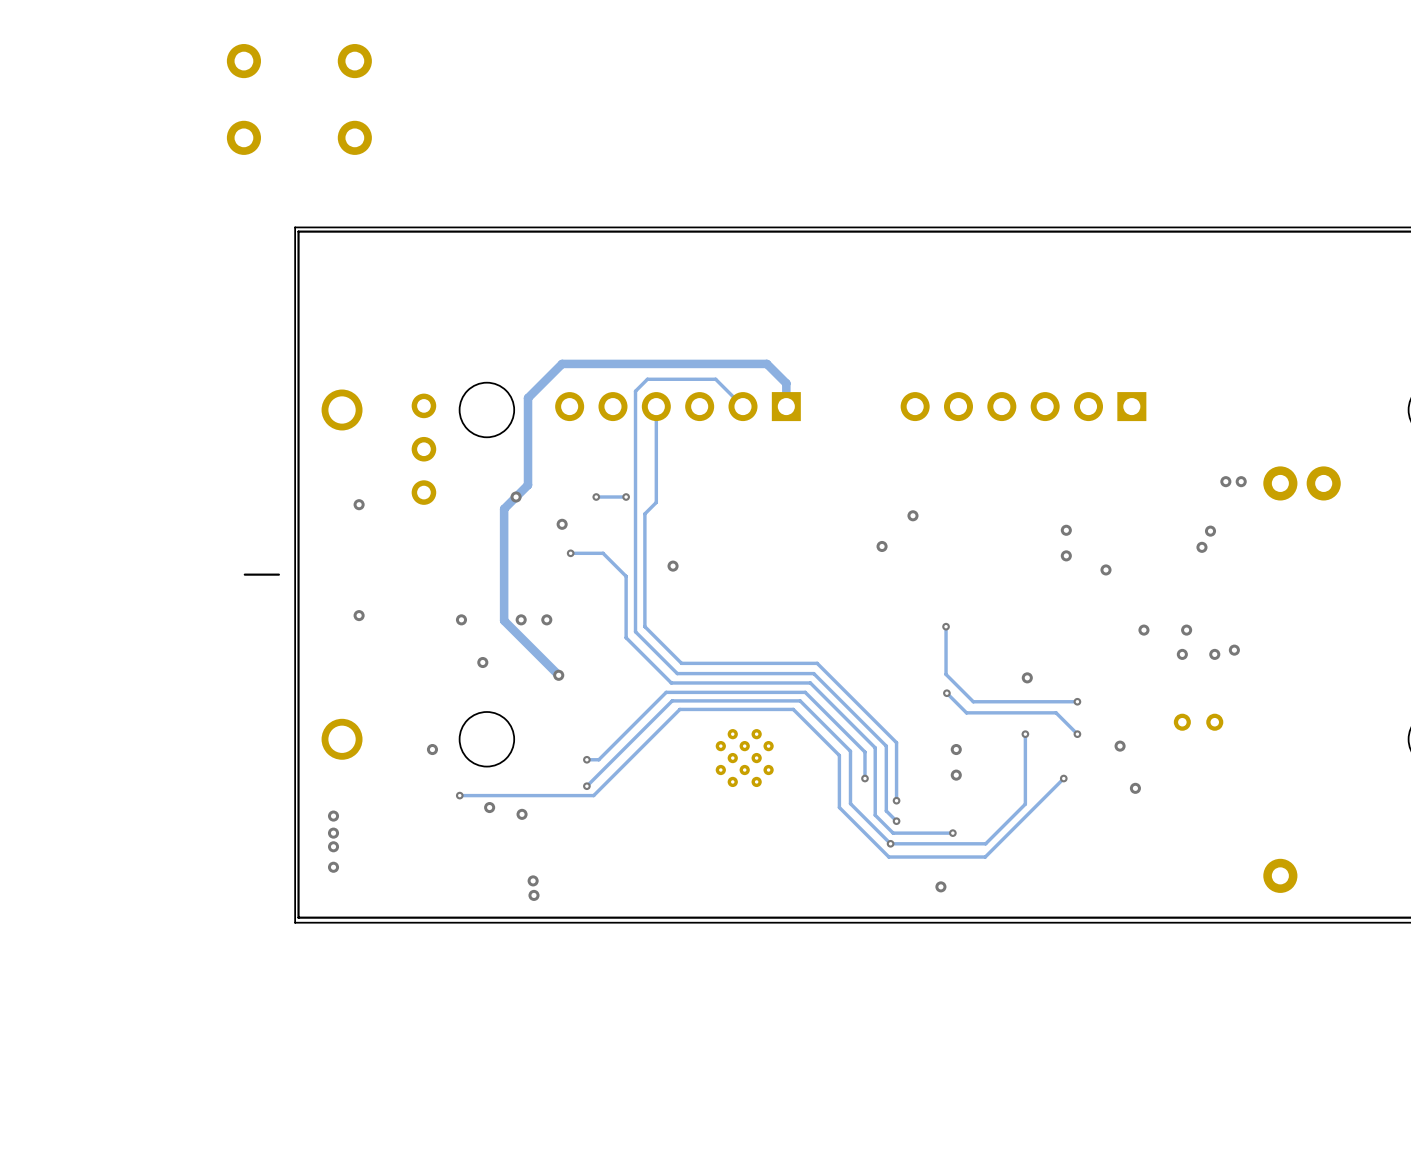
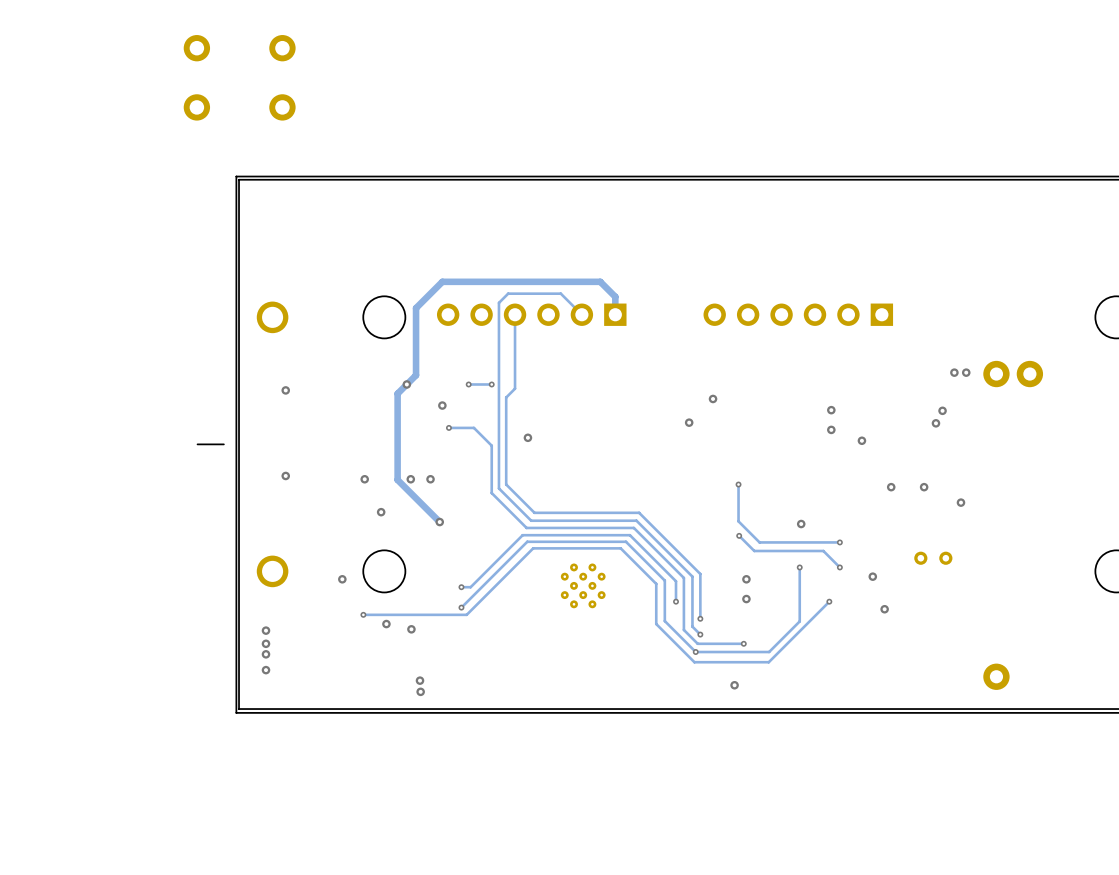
part: (423, 449) -> none
via: (1182, 654) -> none
via: (1214, 654) -> none

